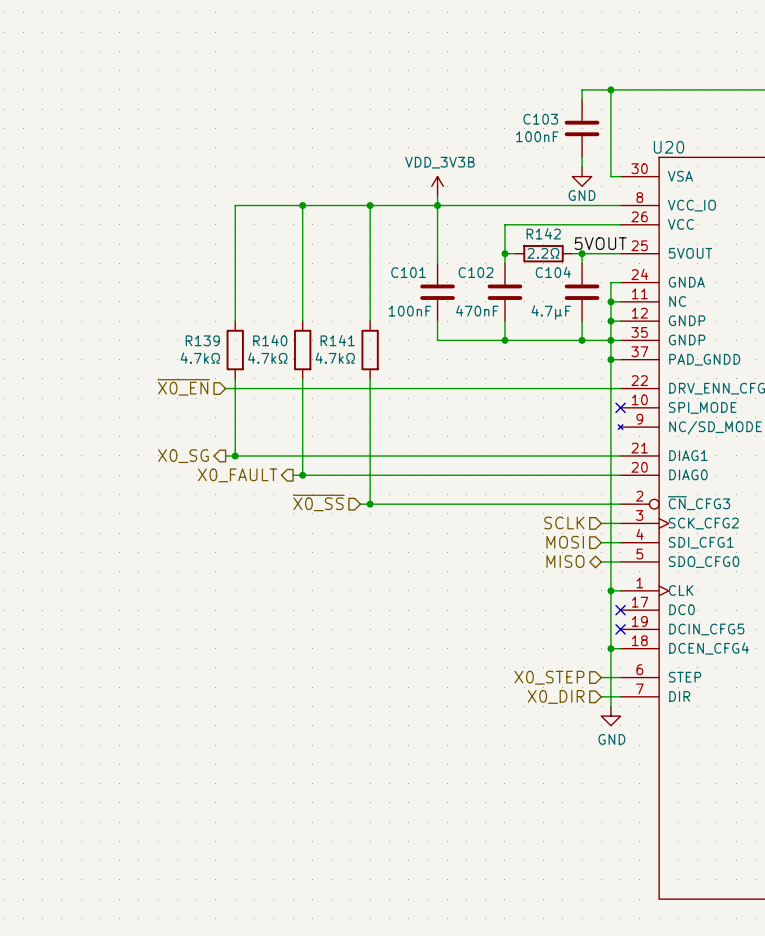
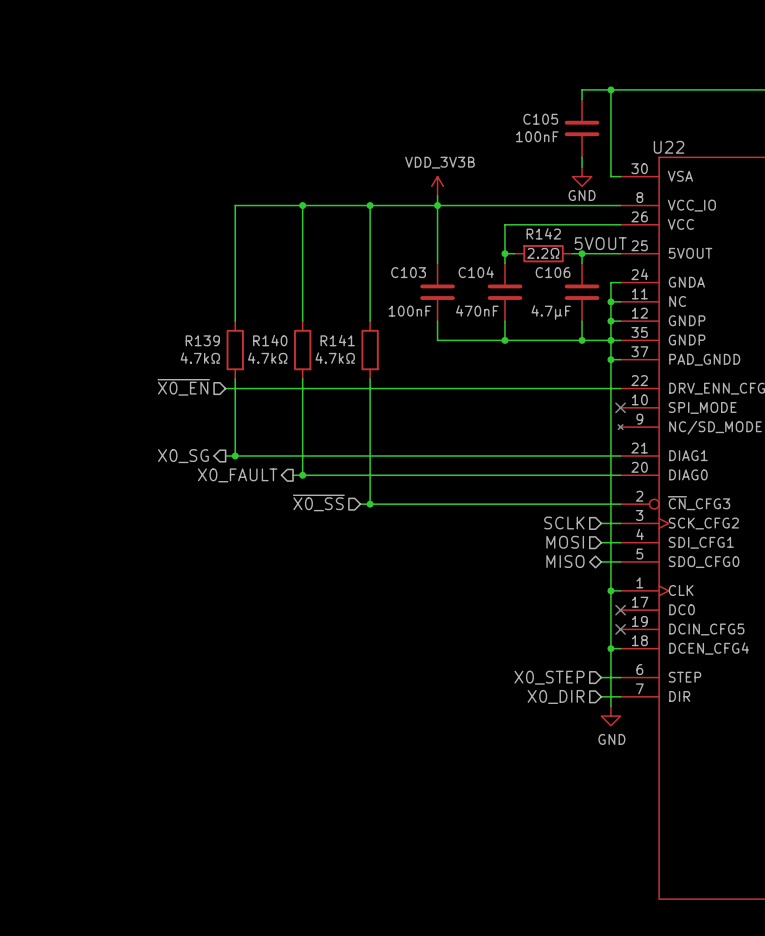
C103 name: C103 (540, 119) -> C105 (540, 119)
U20 name: U20 (669, 147) -> U22 (669, 147)
C101 name: C101 (408, 272) -> C103 (408, 272)
C102 name: C102 (476, 272) -> C104 (476, 272)
C104 name: C104 (553, 272) -> C106 (553, 272)

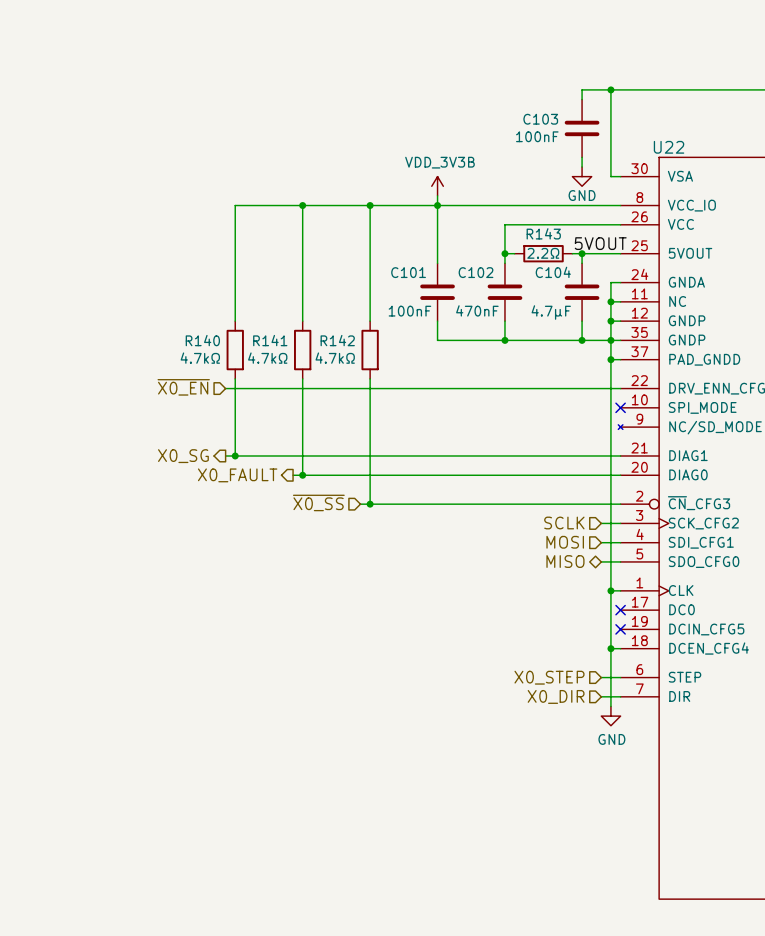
C105 name: C105 (540, 119) -> C103 (540, 119)
R142 name: R142 (543, 233) -> R143 (543, 233)
C103 name: C103 (408, 272) -> C101 (408, 272)
C104 name: C104 (476, 272) -> C102 (476, 272)
C106 name: C106 (553, 272) -> C104 (553, 272)
R139 name: R139 (202, 340) -> R140 (202, 340)
R140 name: R140 (270, 340) -> R141 (270, 340)
R141 name: R141 (337, 340) -> R142 (337, 340)

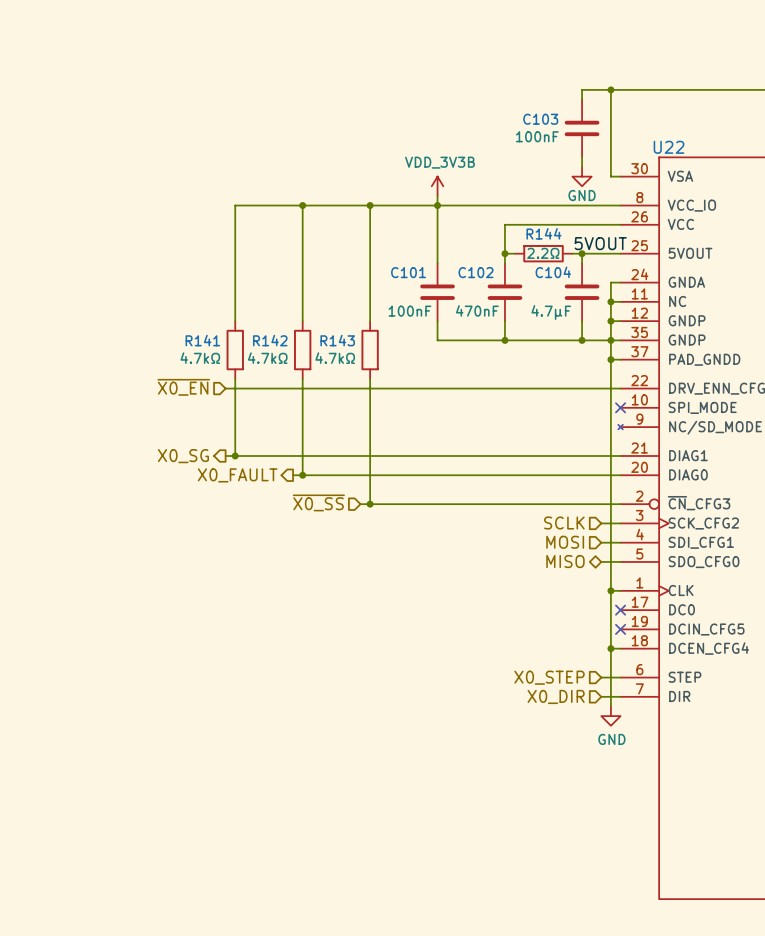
R143 name: R143 (543, 233) -> R144 (543, 233)
R140 name: R140 (202, 340) -> R141 (202, 340)
R141 name: R141 (270, 340) -> R142 (270, 340)
R142 name: R142 (337, 340) -> R143 (337, 340)

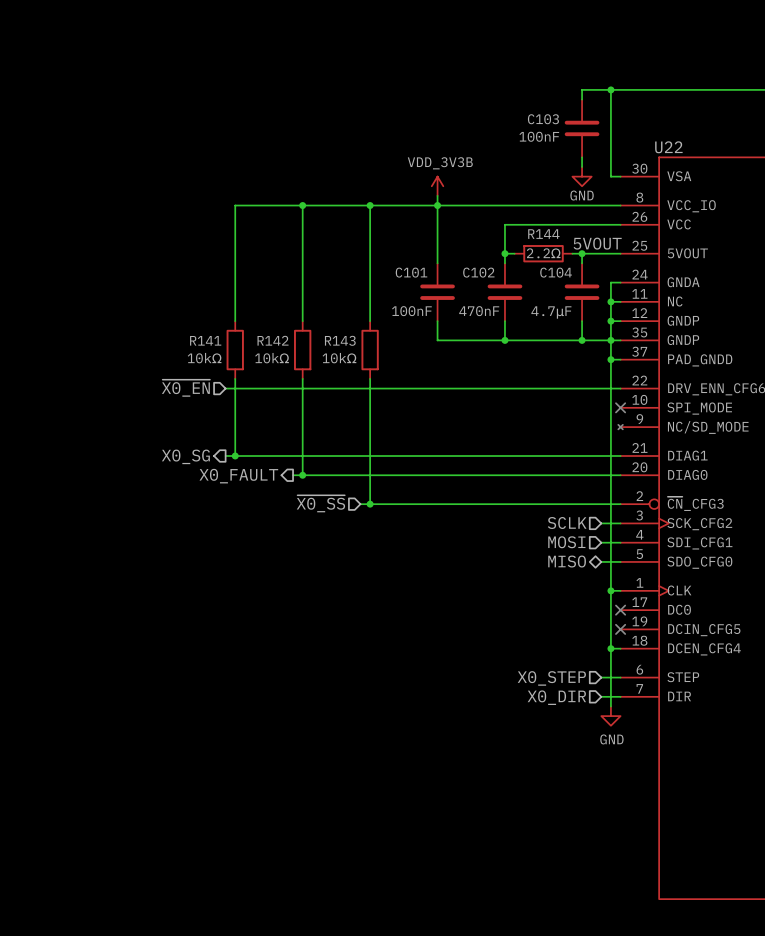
R141 value: 4.7kΩ (200, 358) -> 10kΩ (204, 358)
R142 value: 4.7kΩ (267, 358) -> 10kΩ (272, 358)
R143 value: 4.7kΩ (335, 358) -> 10kΩ (339, 358)

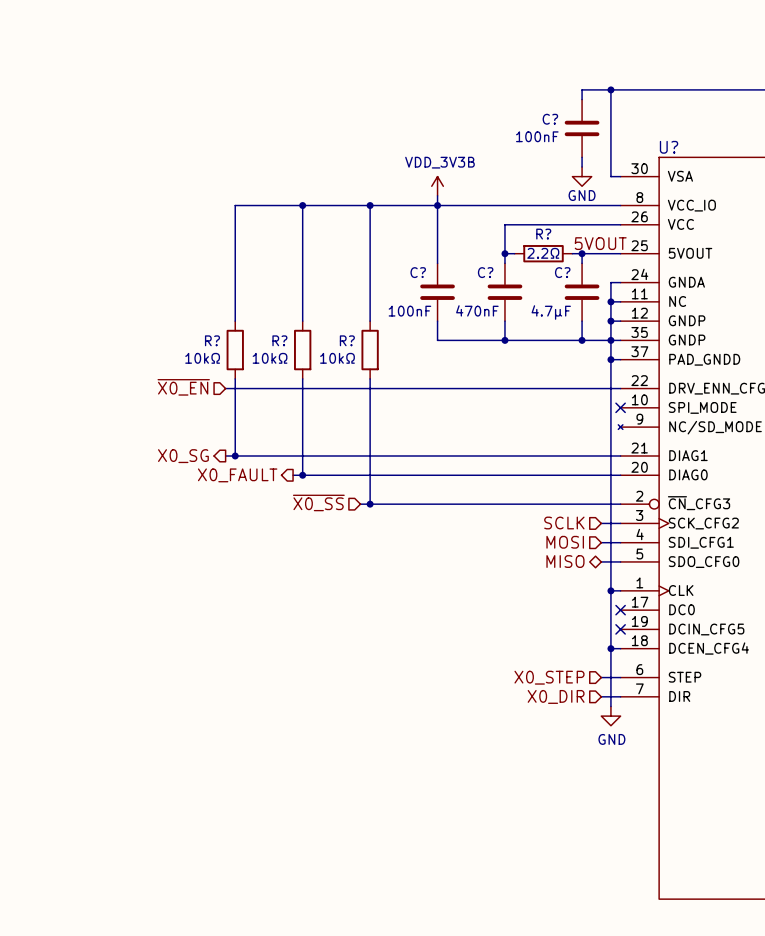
C103 name: C103 (543, 119) -> C? (550, 119)
U22 name: U22 (668, 147) -> U? (669, 147)
R144 name: R144 (543, 234) -> R? (543, 234)
C101 name: C101 (411, 272) -> C? (418, 272)
C102 name: C102 (478, 272) -> C? (485, 272)
C104 name: C104 (556, 272) -> C? (562, 272)
R141 name: R141 (205, 340) -> R? (212, 340)
R142 name: R142 (273, 340) -> R? (279, 340)
R143 name: R143 (340, 340) -> R? (347, 340)

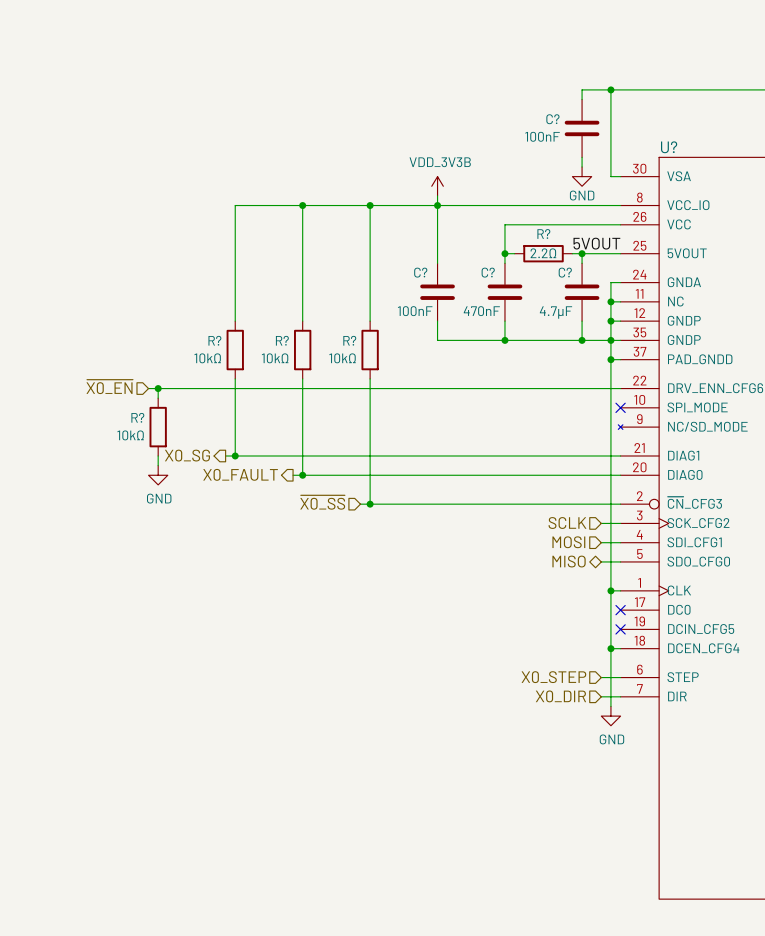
hierarchical label position: ~{X0_EN} (183, 387) -> ~{X0_EN} (109, 386)
wire: none -> (148, 388) (225, 388)
wire: none -> (158, 388) (158, 398)
junction: none -> (158, 388)
R?: none -> 10kΩ (158, 427)
wire: none -> (158, 455) (158, 465)
power symbol: none -> GND (158, 475)

